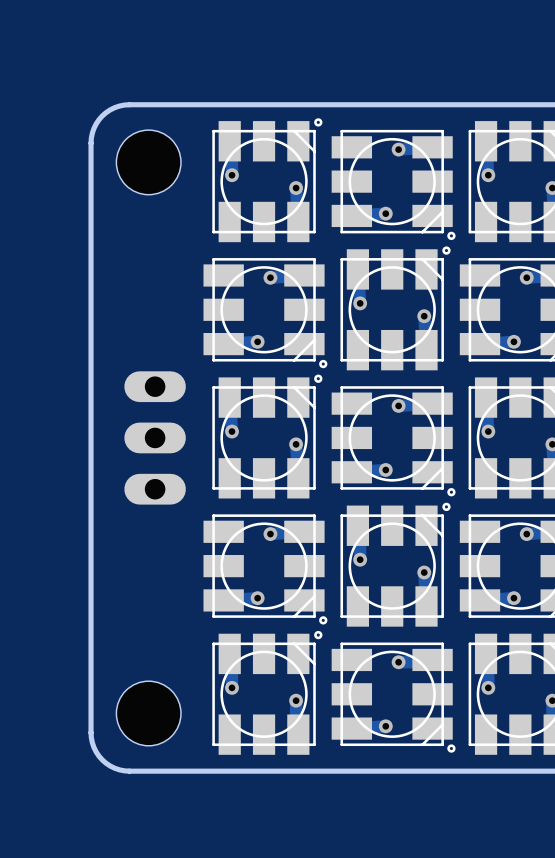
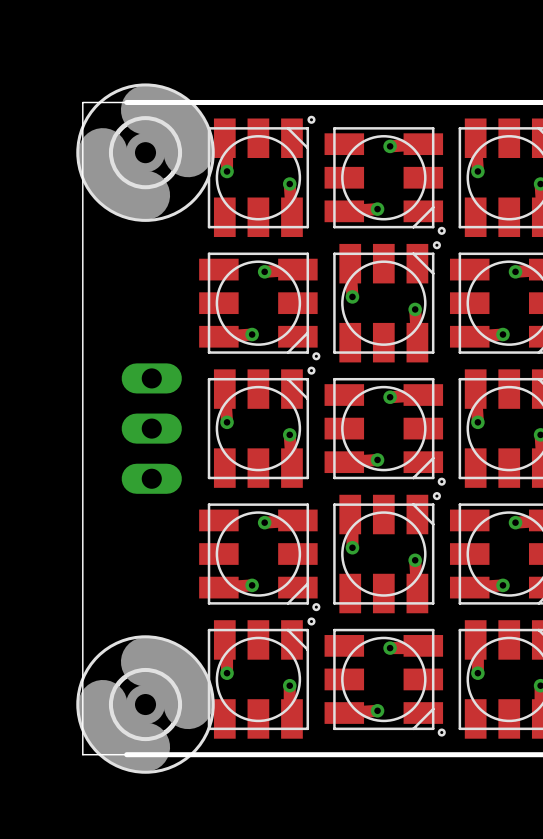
board edge: none -> (82, 102) (126, 102)
board edge: (129, 104) (114, 107) (102, 115) (93, 128) (91, 143) (91, 732) (93, 747) (102, 759) (114, 768) (129, 771) -> (82, 102) (82, 754) (126, 754)
part: none -> (145, 152)
hole: (148, 162) -> none
hole: (148, 713) -> none
part: none -> (145, 704)

